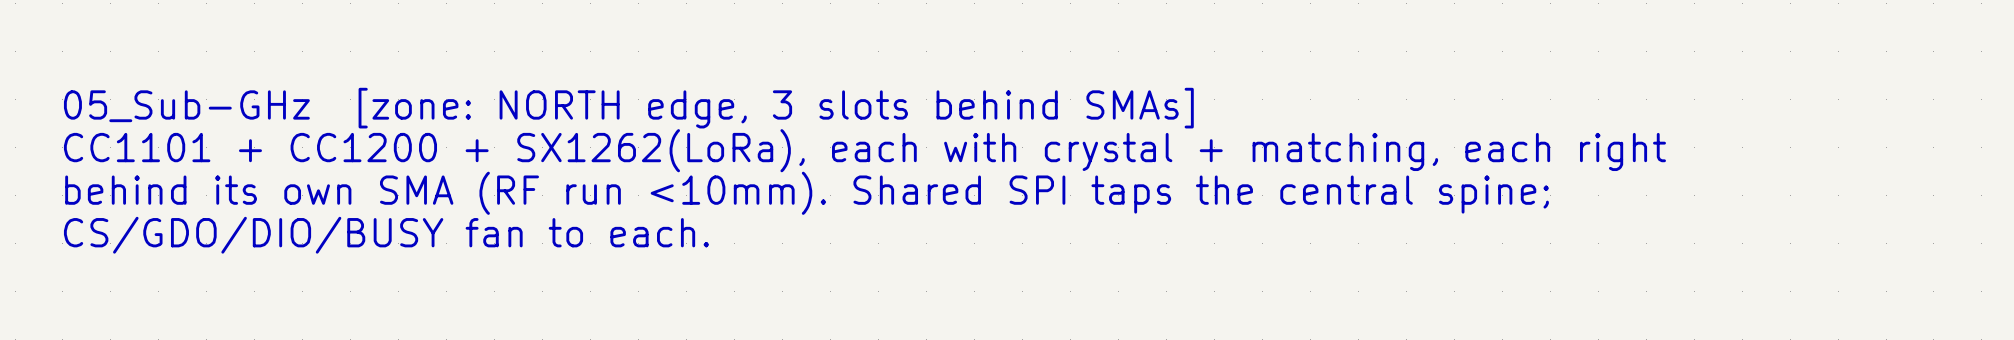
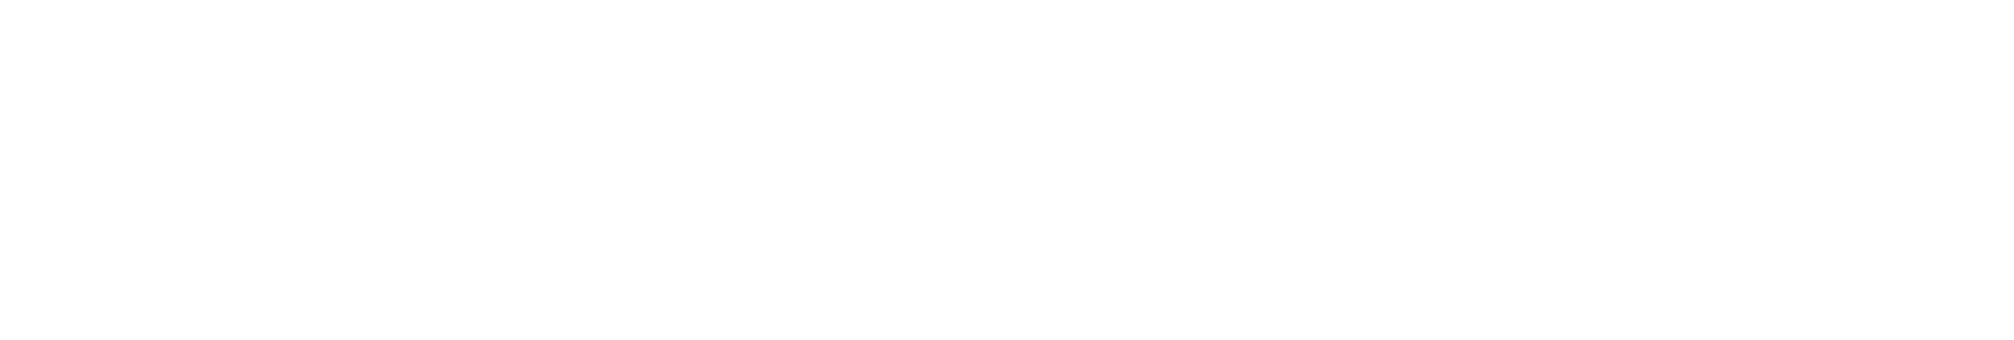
text: 05_Sub-GHz [zone: NORTH edge, 3 slots behind SMAs] (628, 108) -> none
text: CC1101 + CC1200 + SX1262(LoRa), each with crystal + matching, each right (864, 150) -> none
text: behind its own SMA (RF run <10mm). Shared SPI taps the central spine; (807, 193) -> none
text: CS/GDO/DIO/BUSY fan to each. (386, 235) -> none

